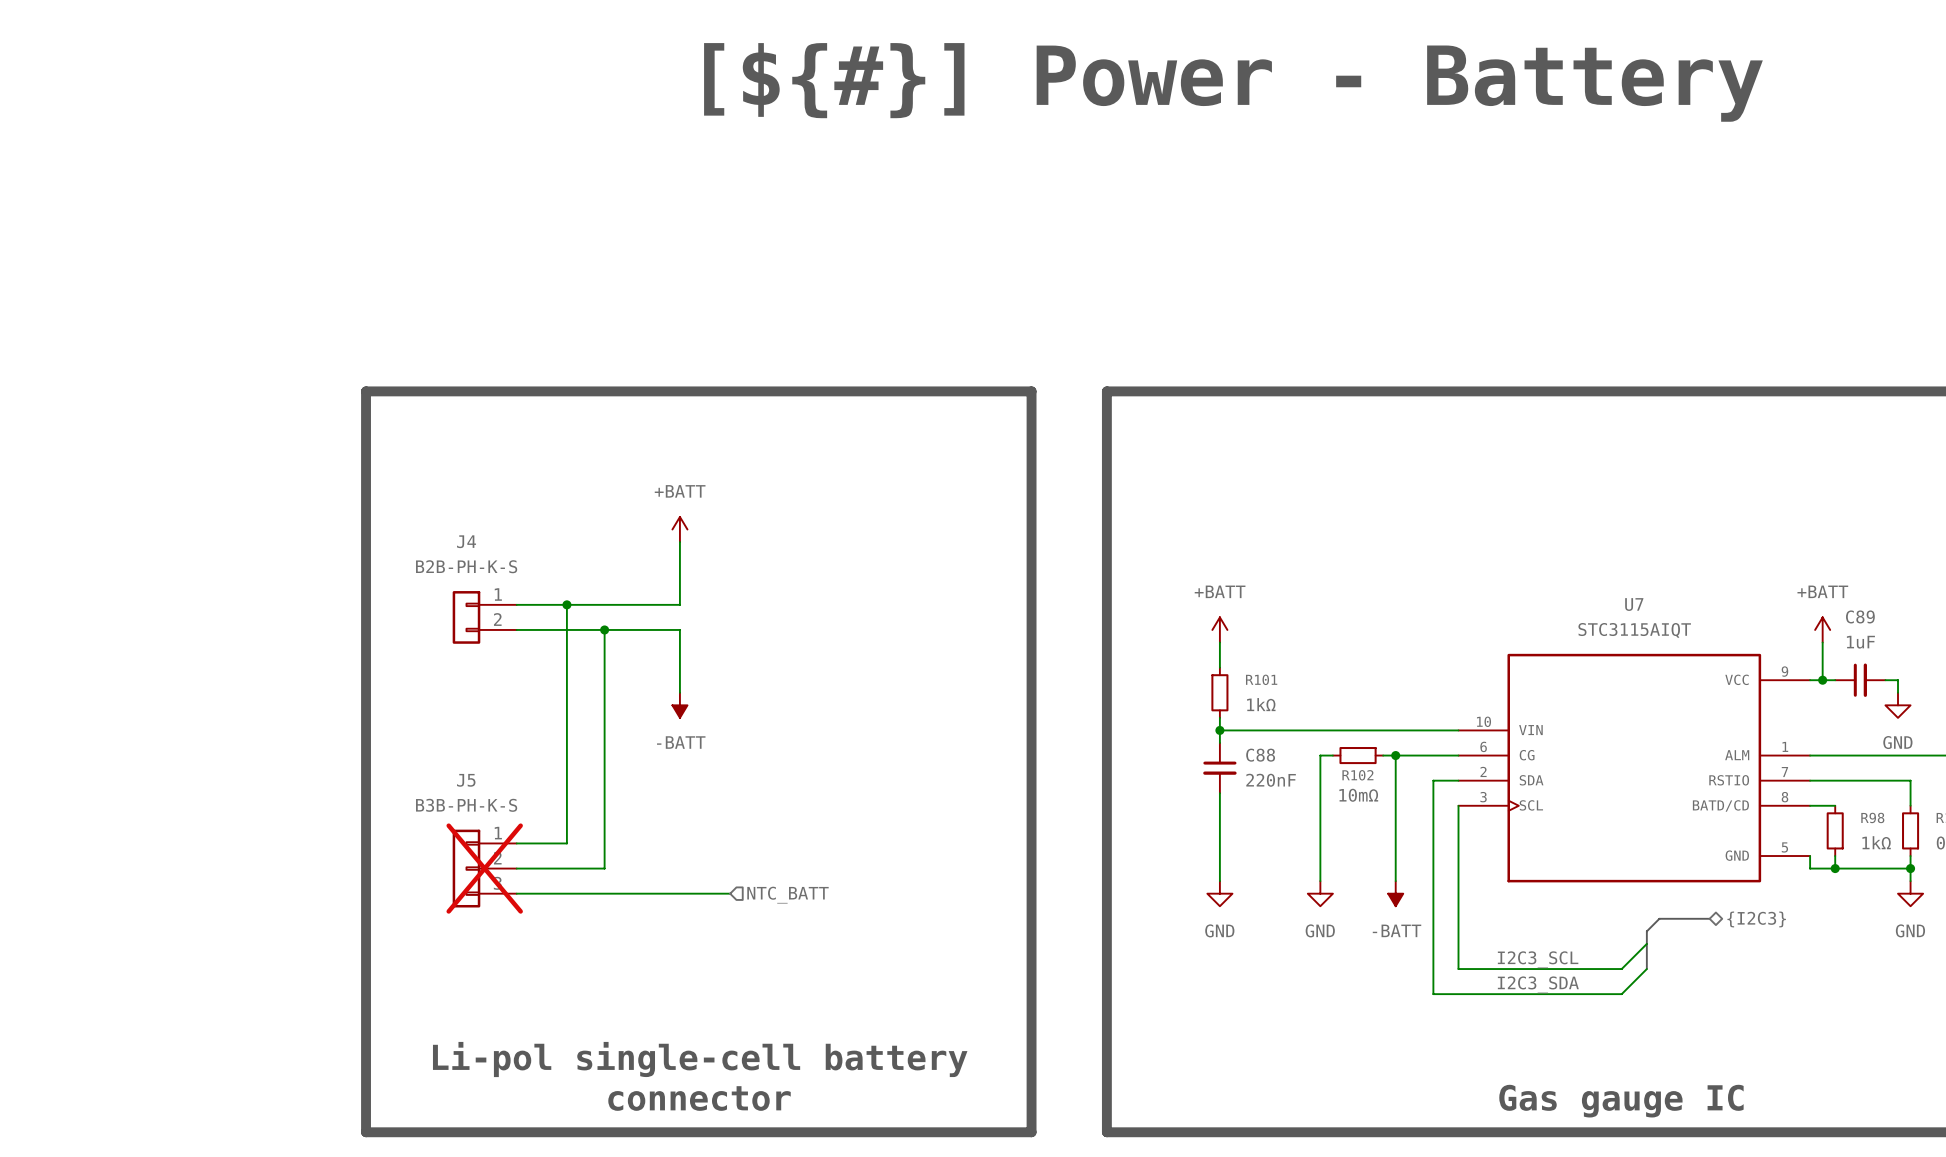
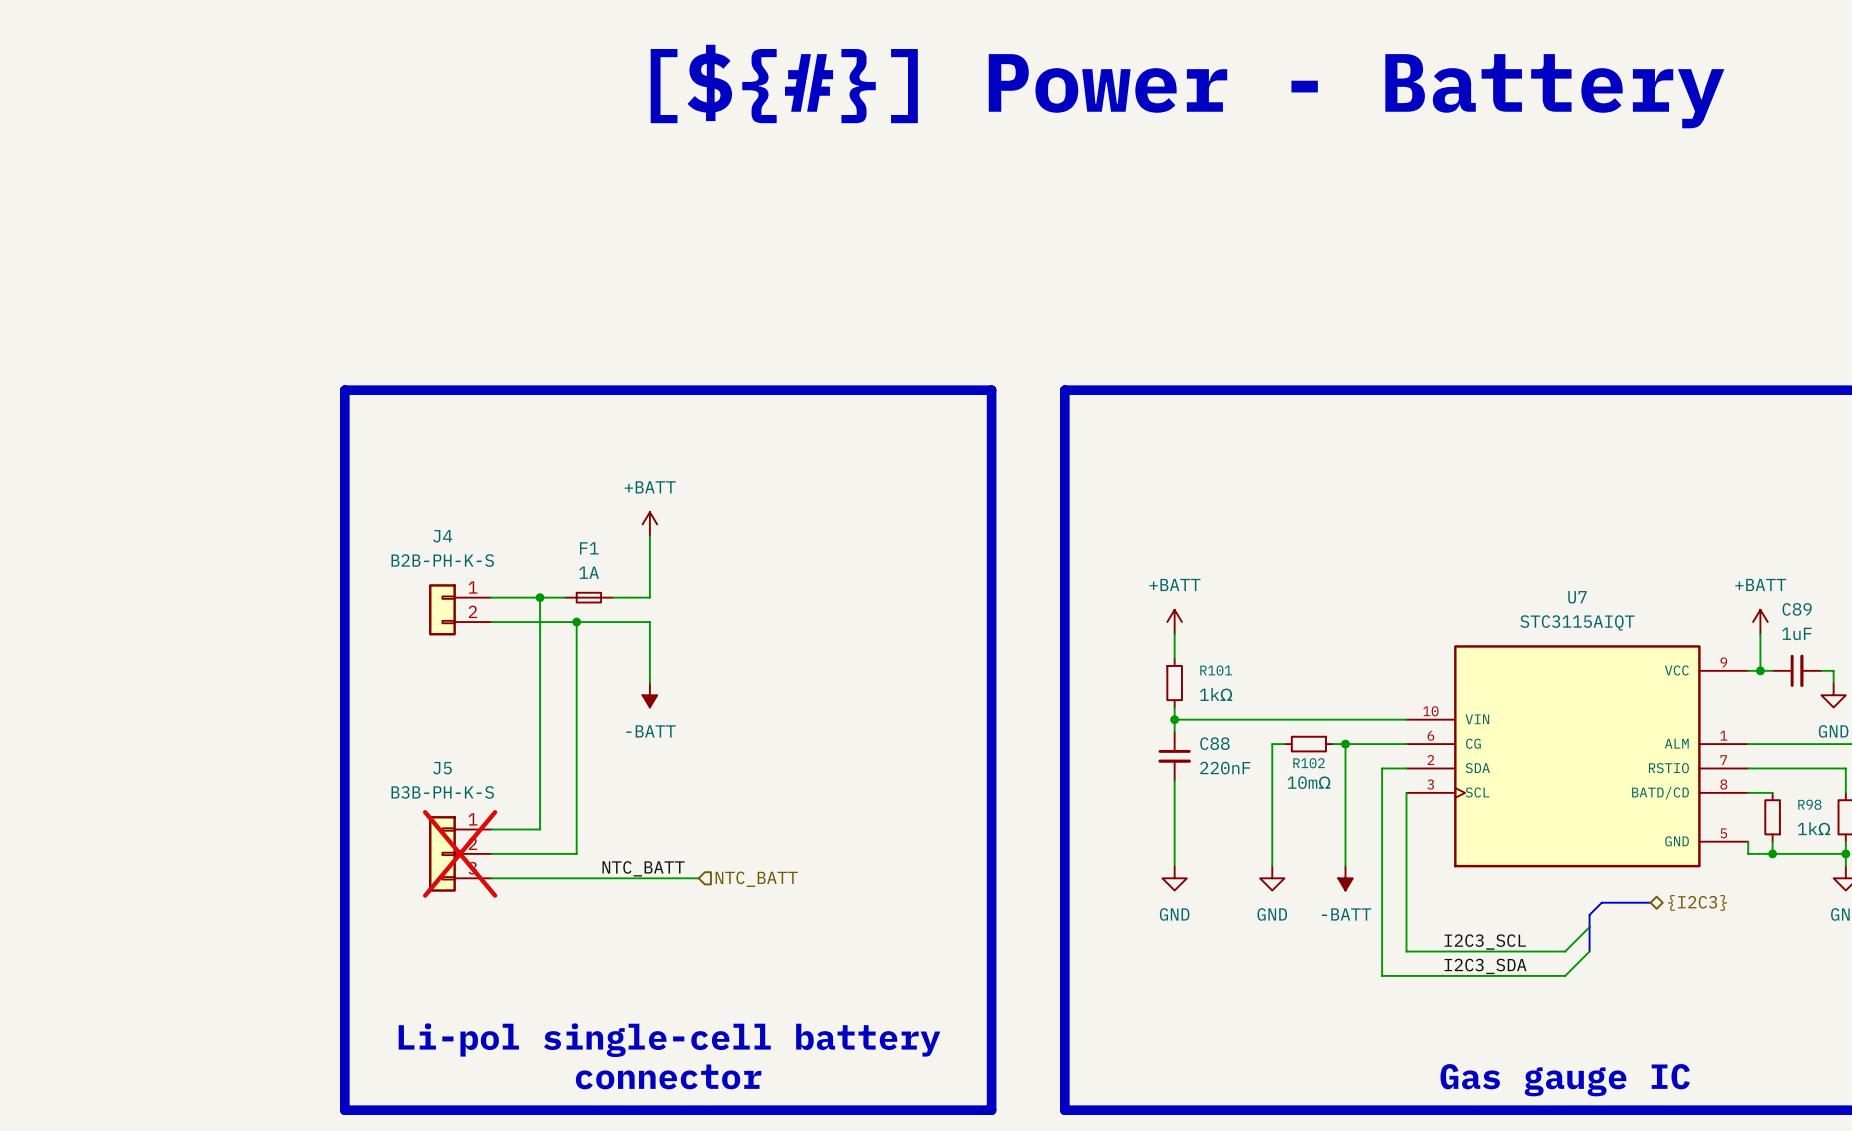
F1: none -> 1A (588, 597)
label: none -> NTC_BATT (643, 868)

